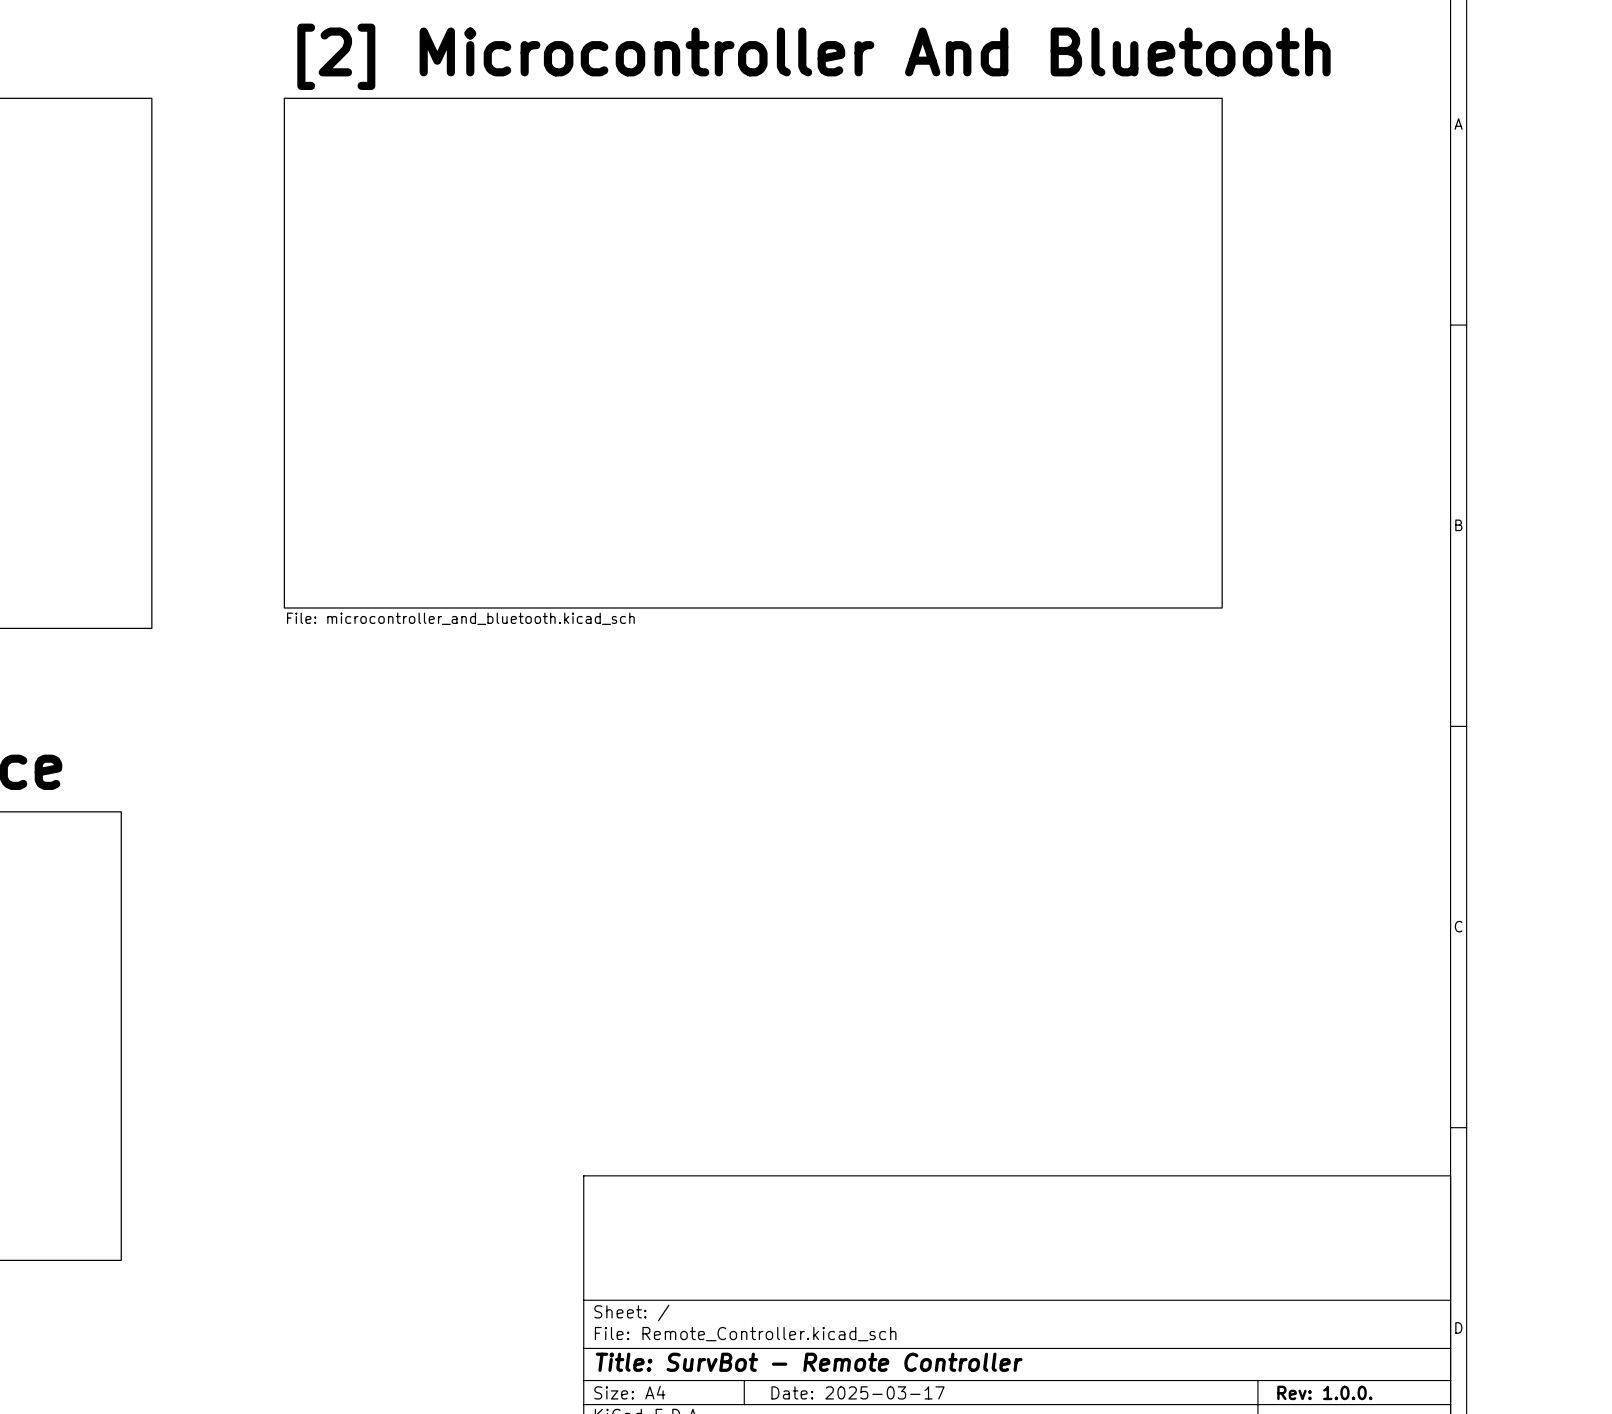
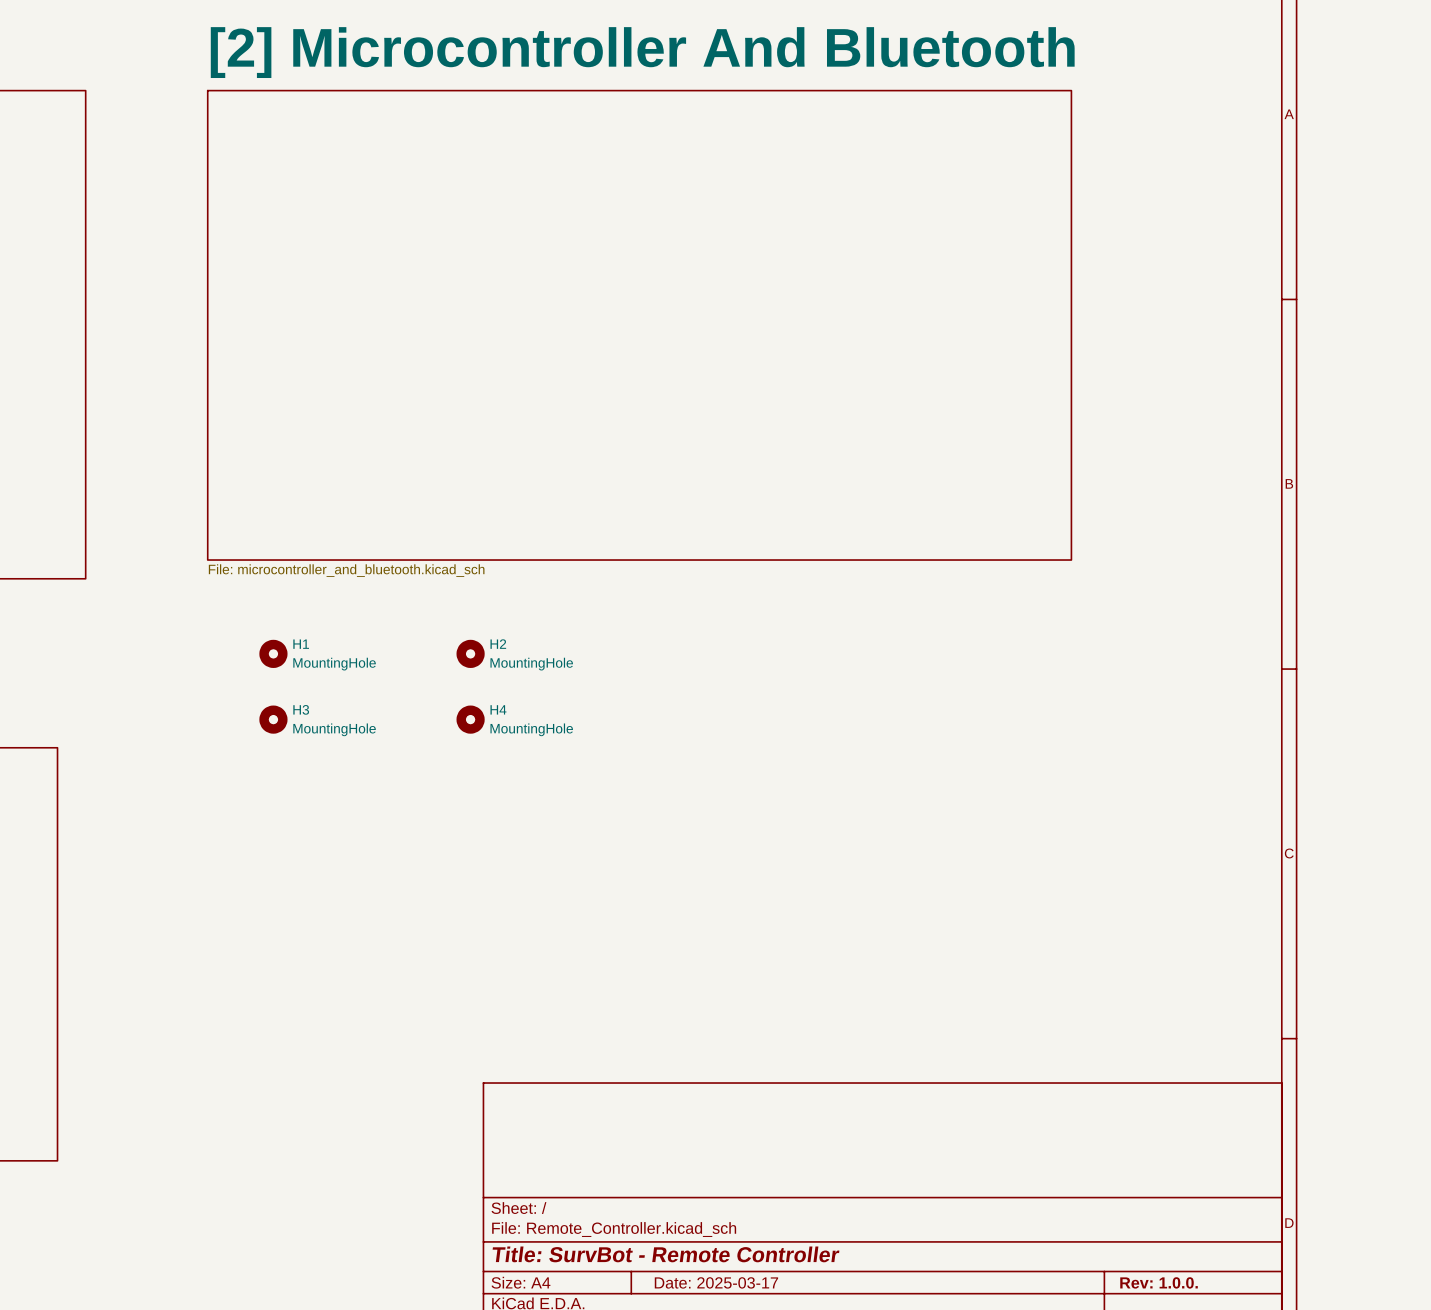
H1: none -> MountingHole (273, 653)
H2: none -> MountingHole (470, 653)
H3: none -> MountingHole (273, 719)
H4: none -> MountingHole (470, 719)

